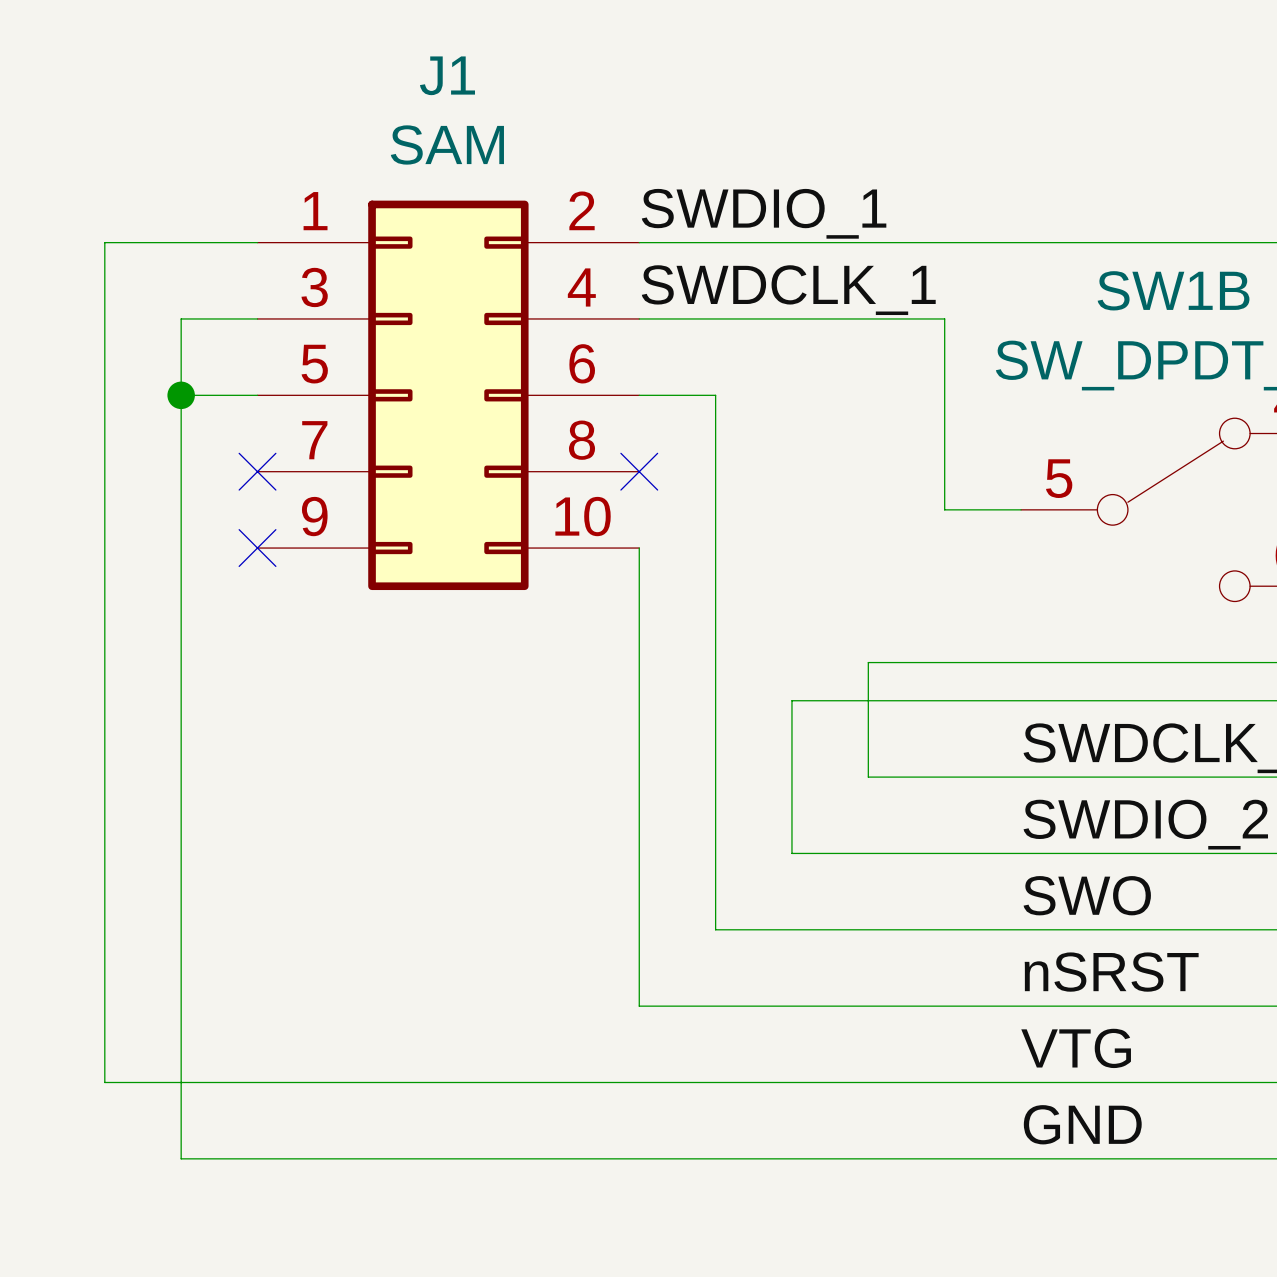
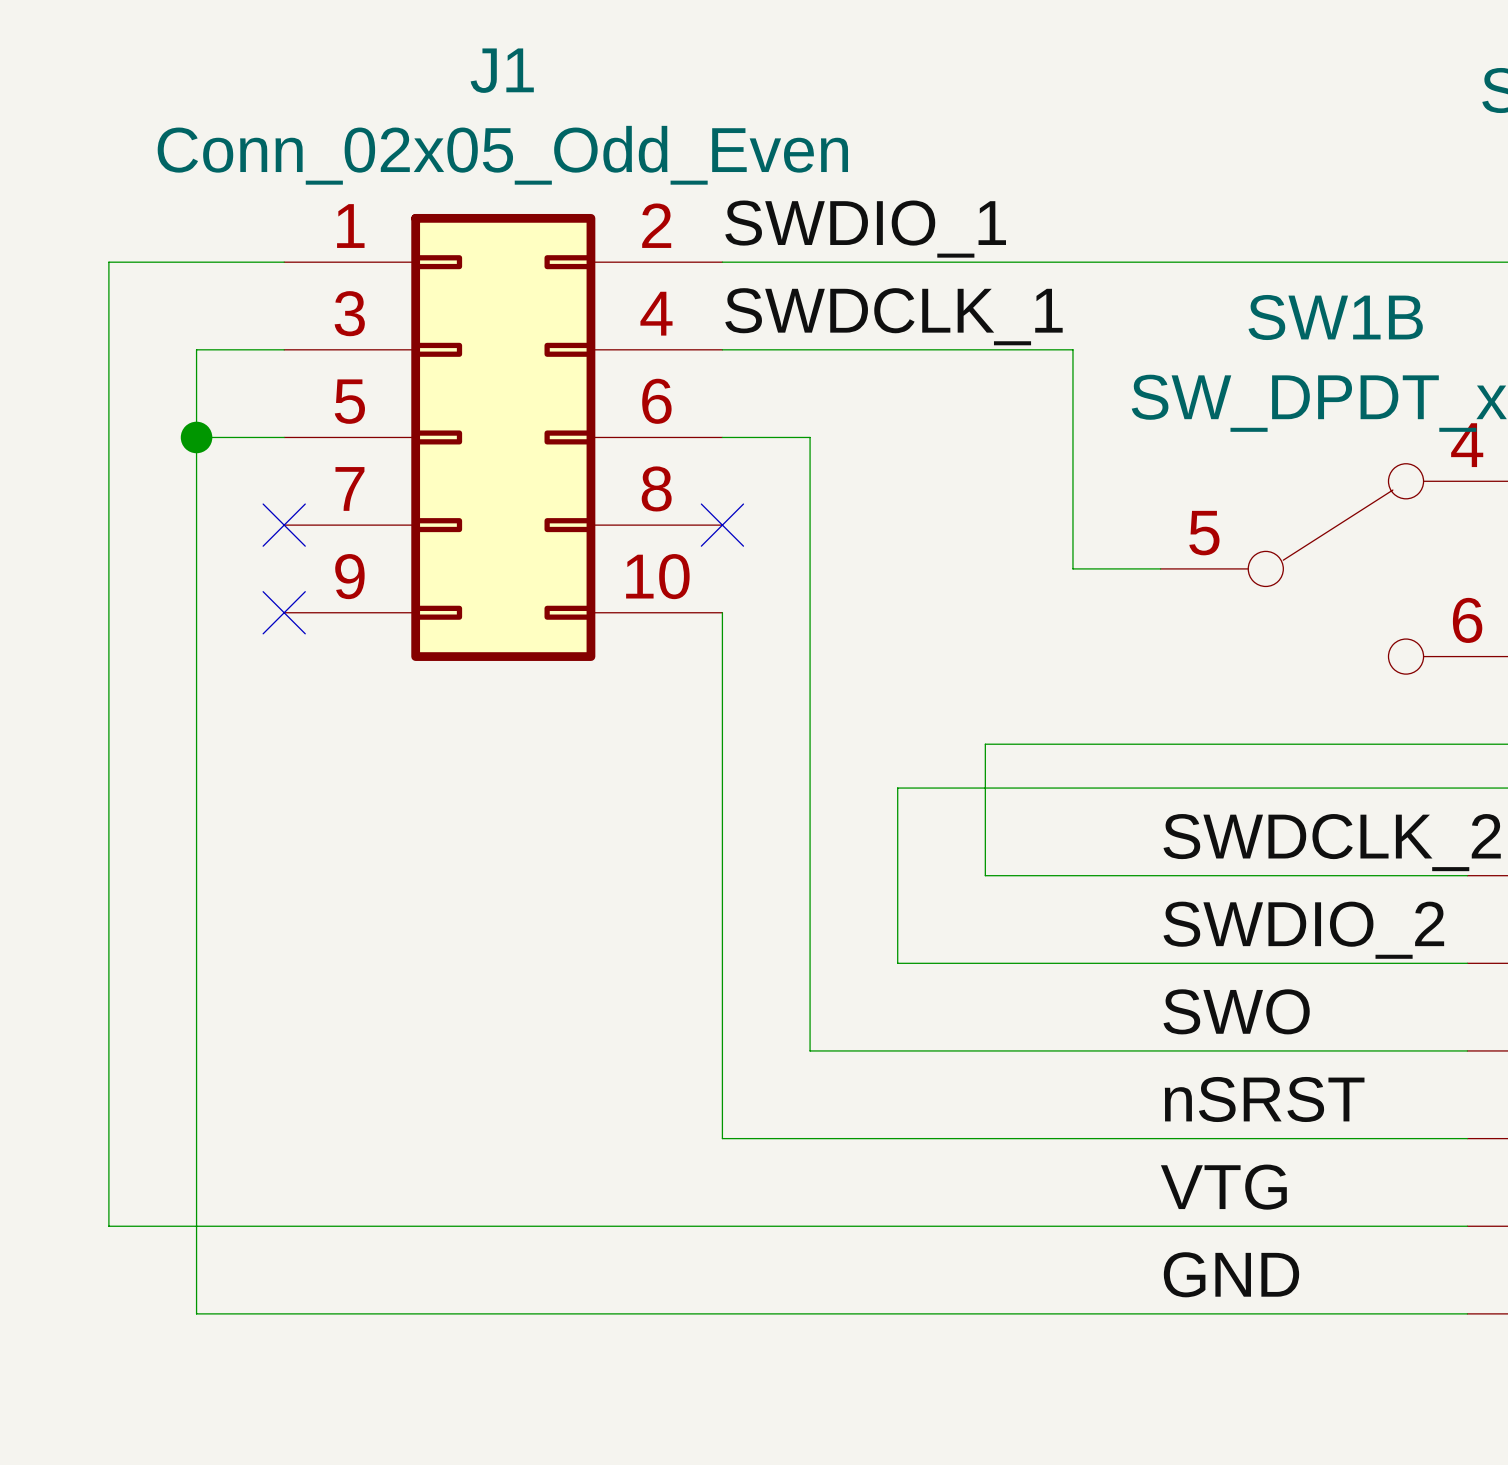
J1 value: SAM (447, 144) -> Conn_02x05_Odd_Even (502, 155)

